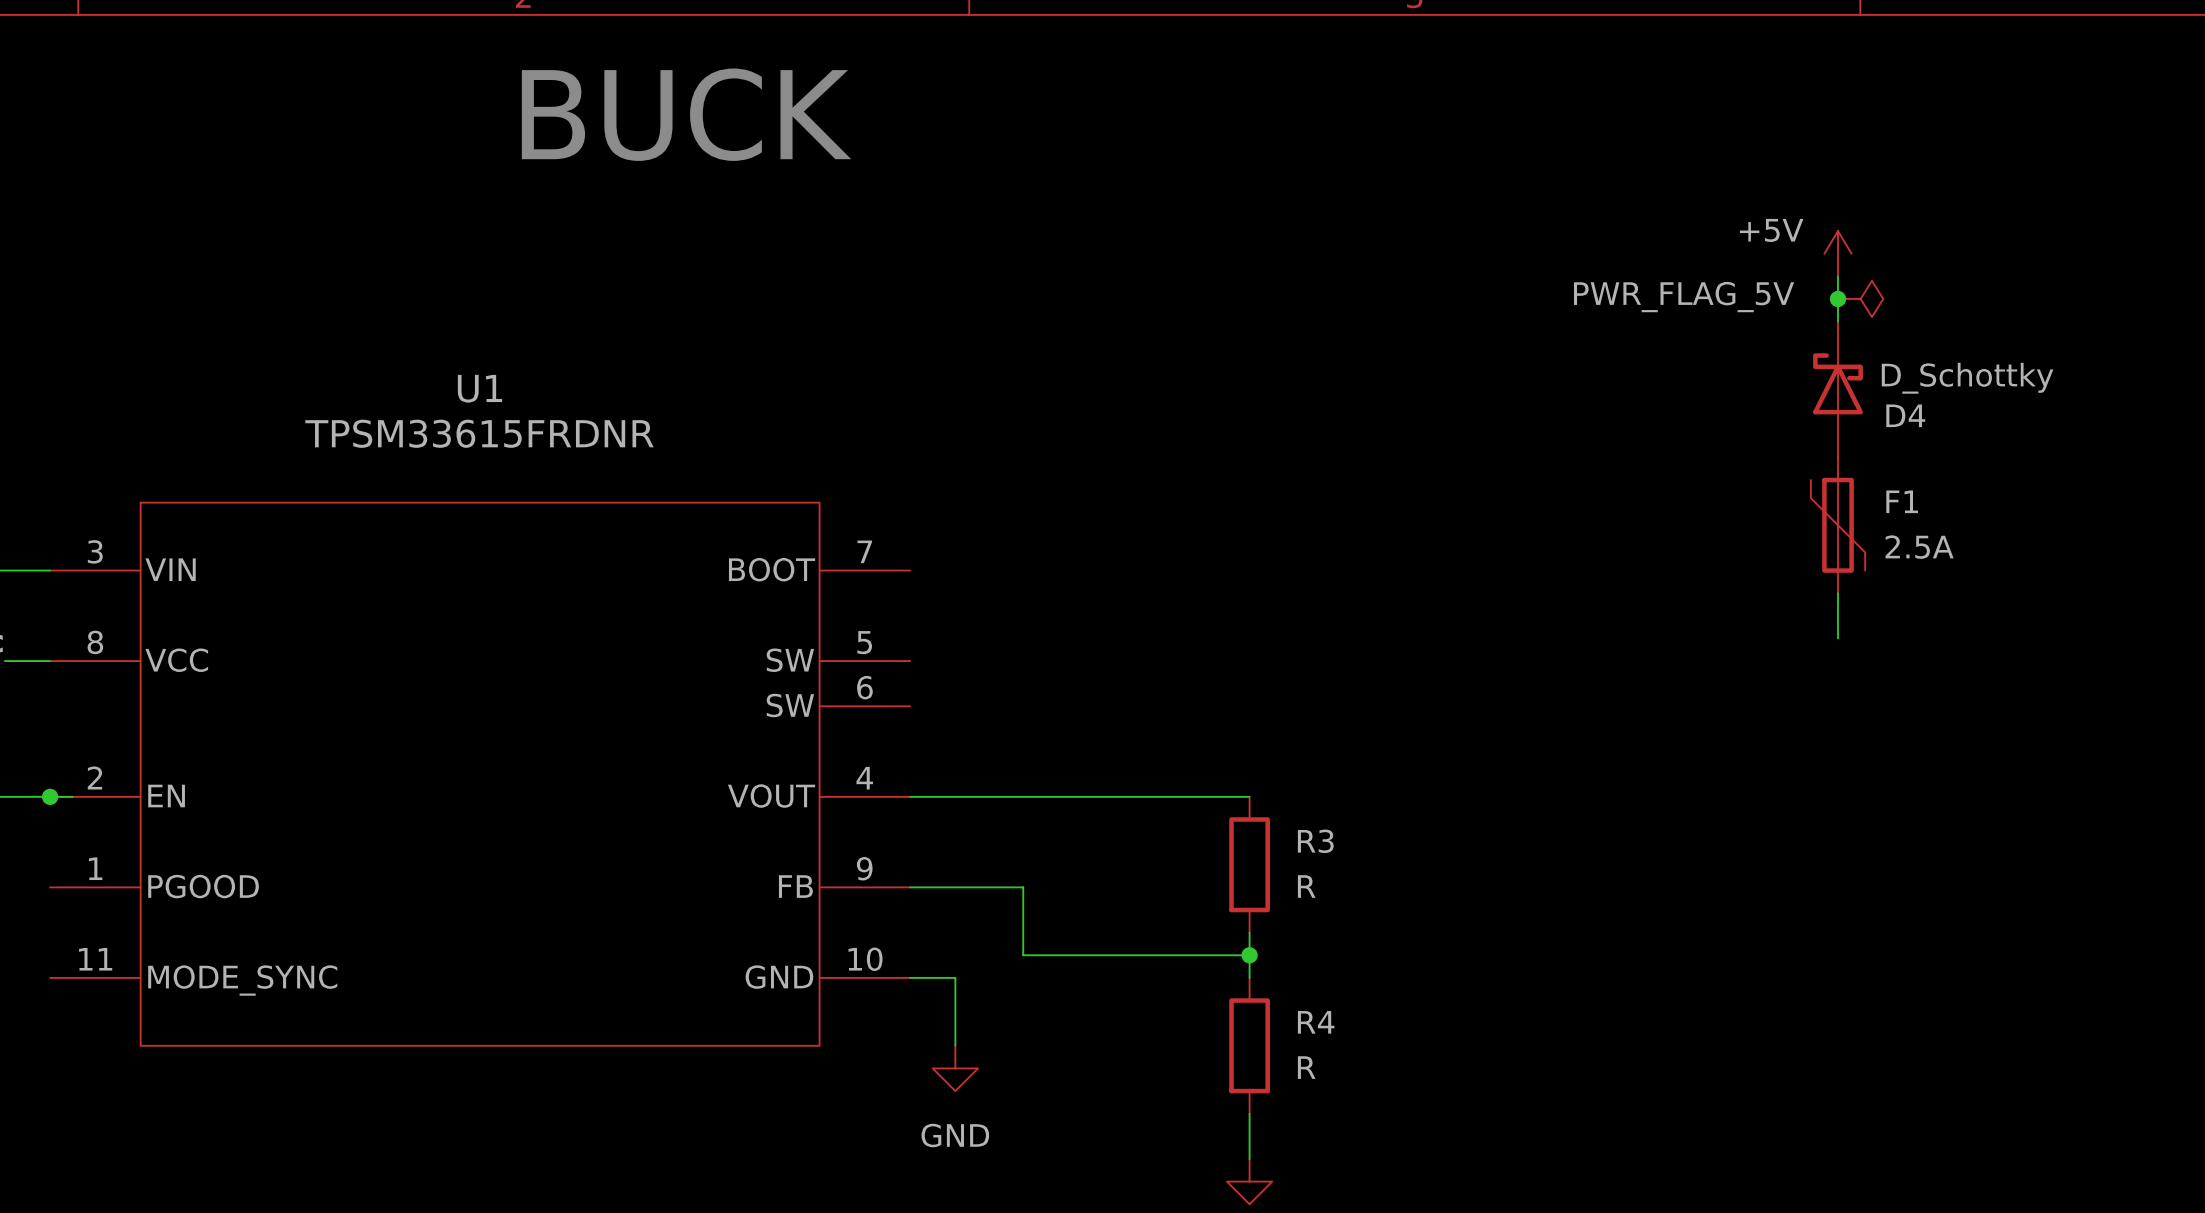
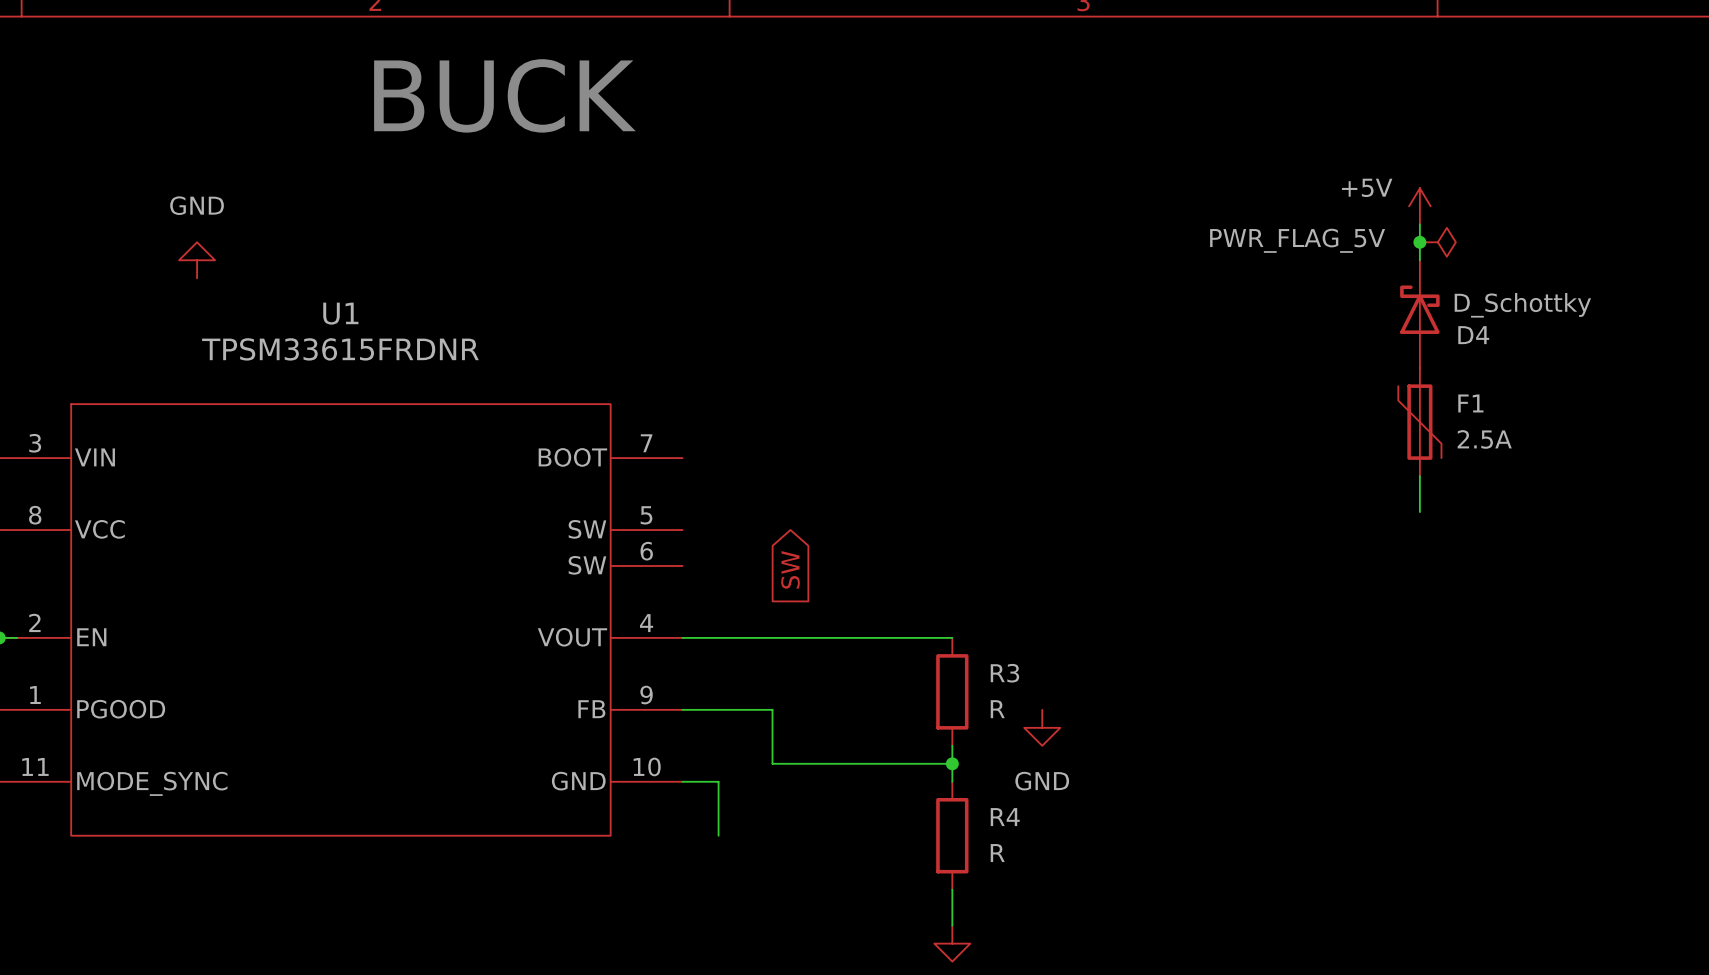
power symbol: none -> GND (197, 260)
global label: none -> SW (790, 569)
power symbol position: GND (955, 1068) -> GND (1042, 727)

